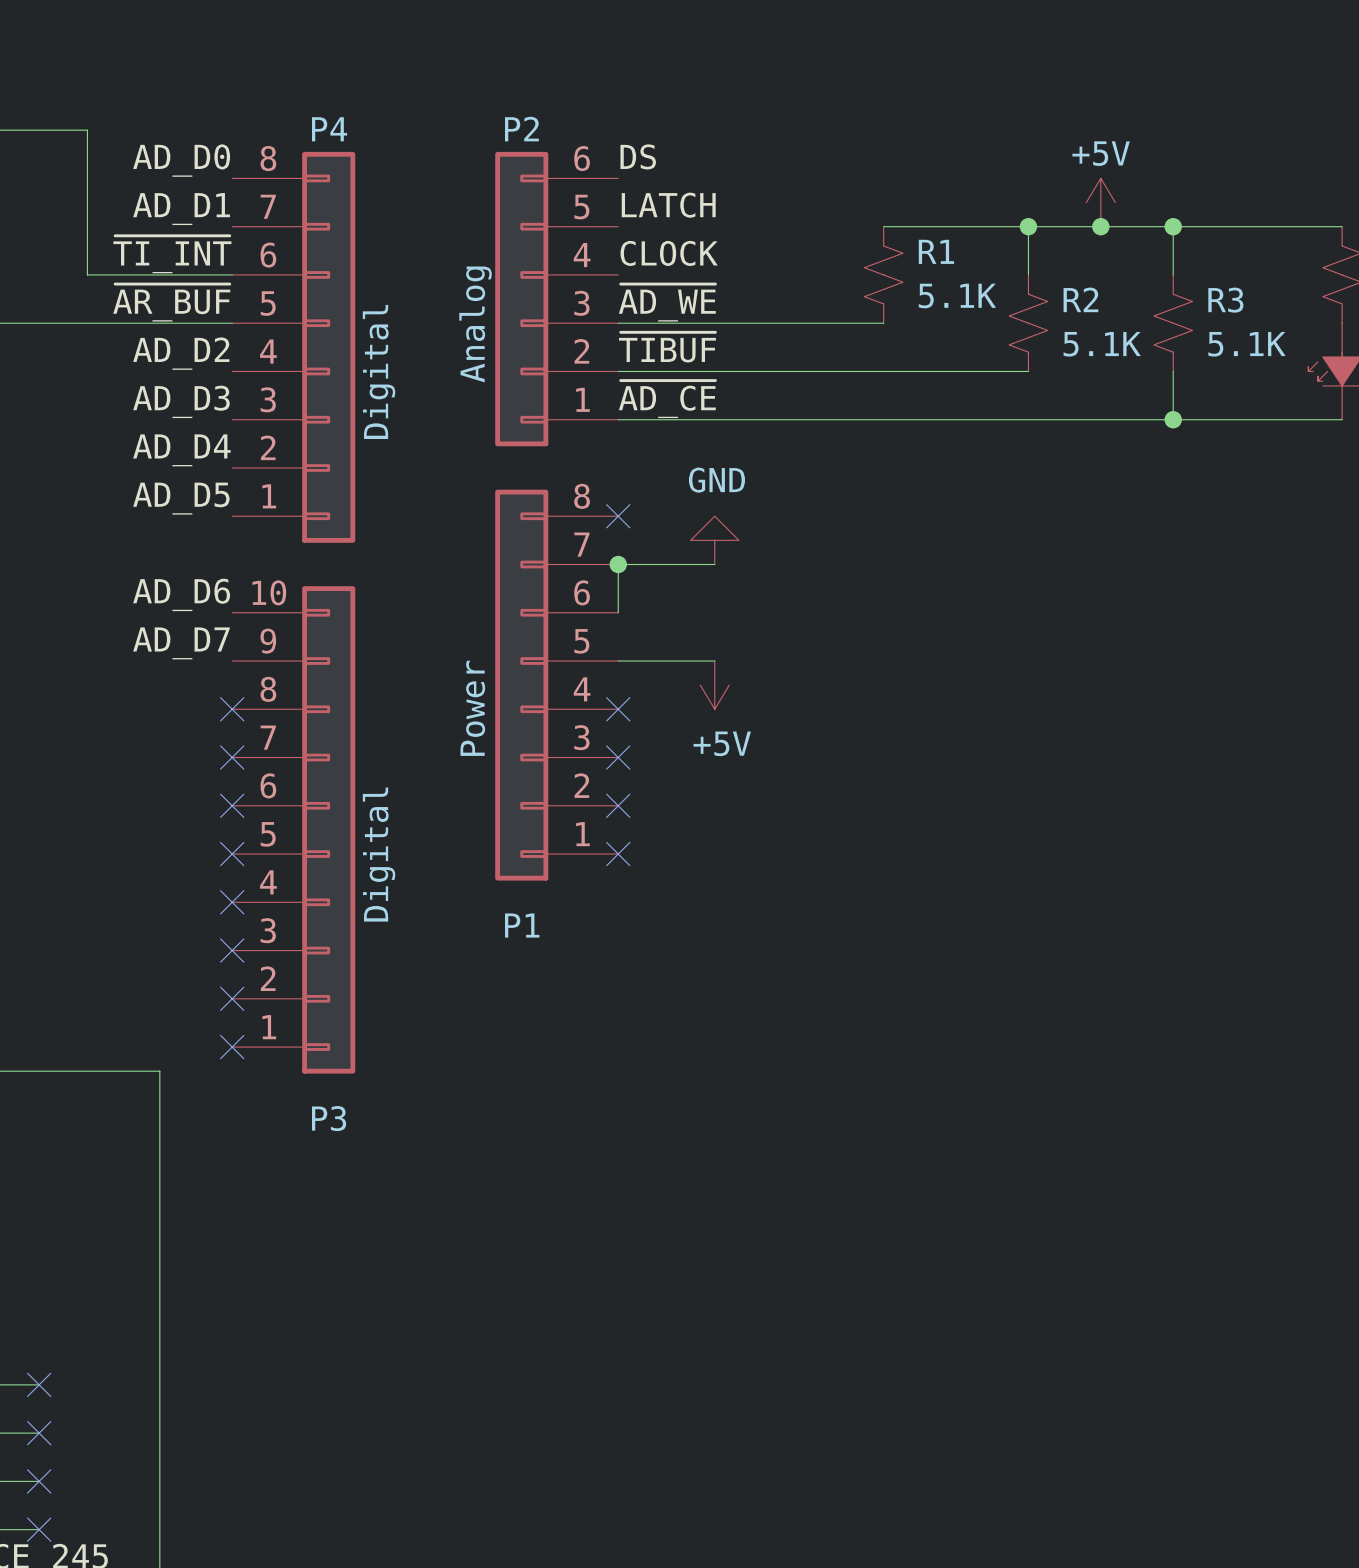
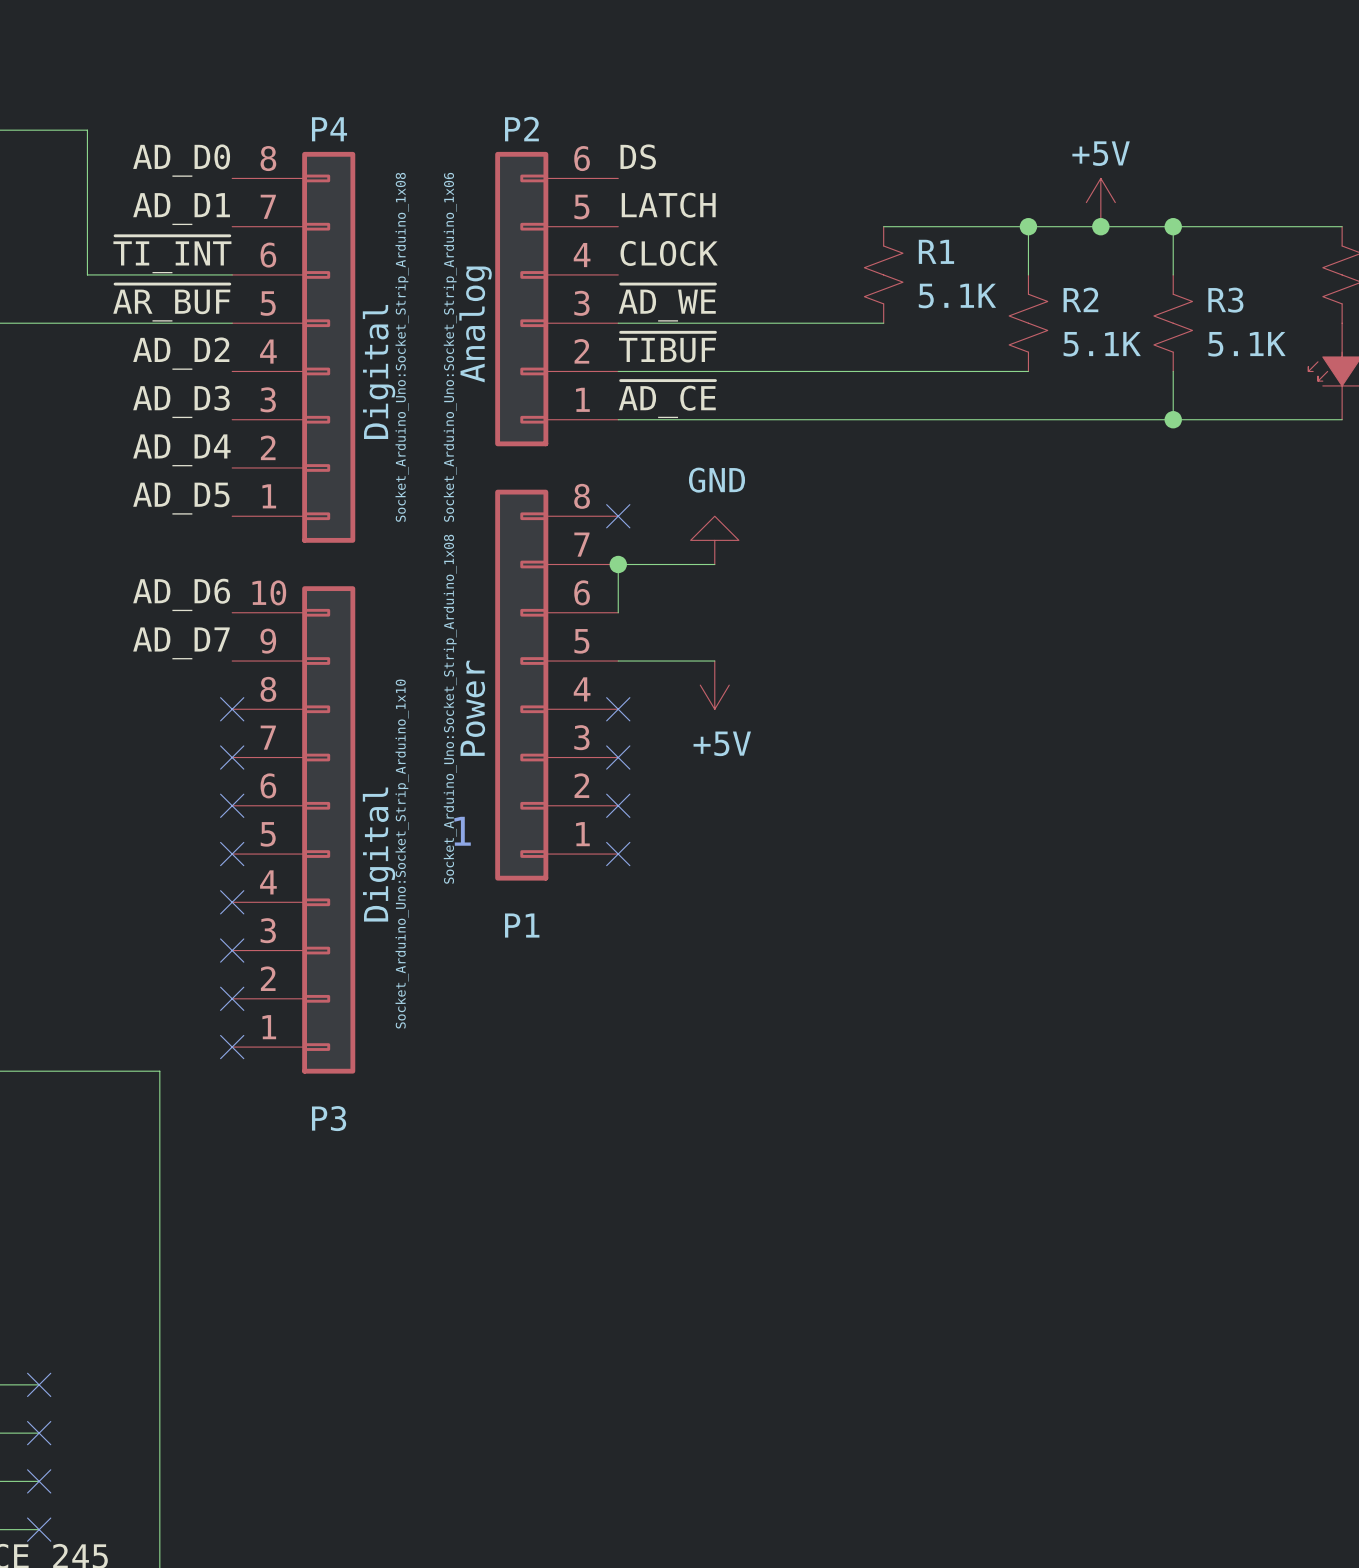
P4 text: none -> Socket_Arduino_Uno:Socket_Strip_Arduino_1x08 (402, 347)
P2 text: none -> Socket_Arduino_Uno:Socket_Strip_Arduino_1x06 (450, 347)
P1 text: none -> Socket_Arduino_Uno:Socket_Strip_Arduino_1x08 (450, 709)
text: none -> 1 (462, 831)
P3 text: none -> Socket_Arduino_Uno:Socket_Strip_Arduino_1x10 (402, 854)

